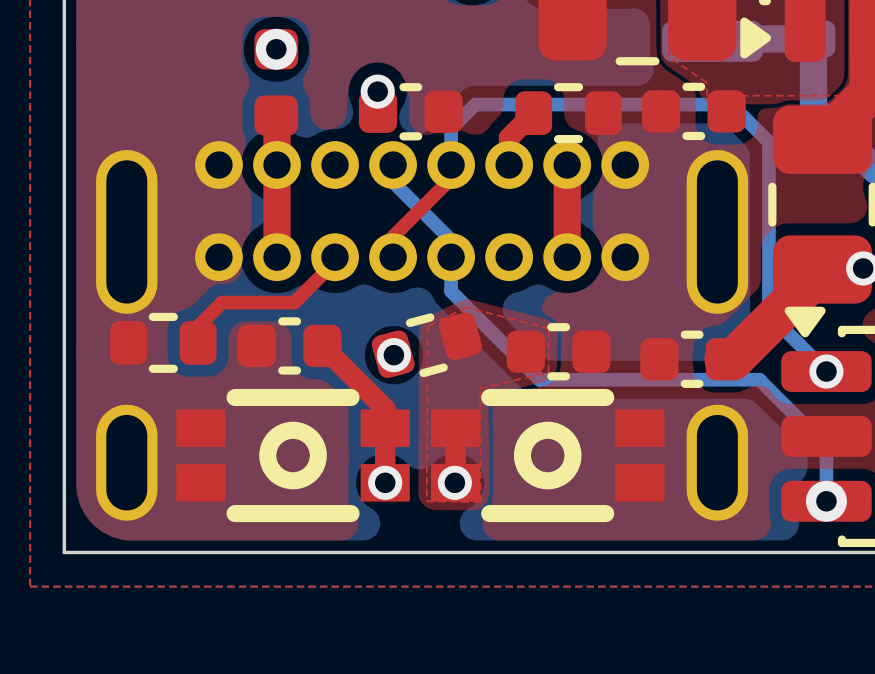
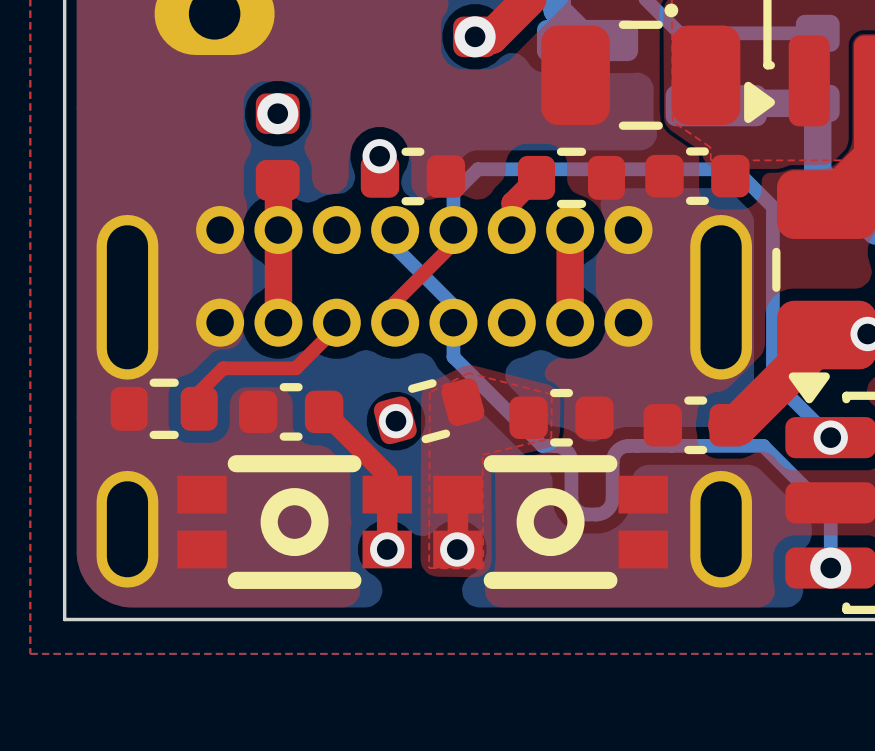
bottom track: (552, 379) (625, 379) -> (554, 445) (565, 449) (570, 456) (573, 505) (579, 511) (587, 514) (601, 513) (610, 506) (612, 499) (613, 456) (618, 449) (629, 445)

